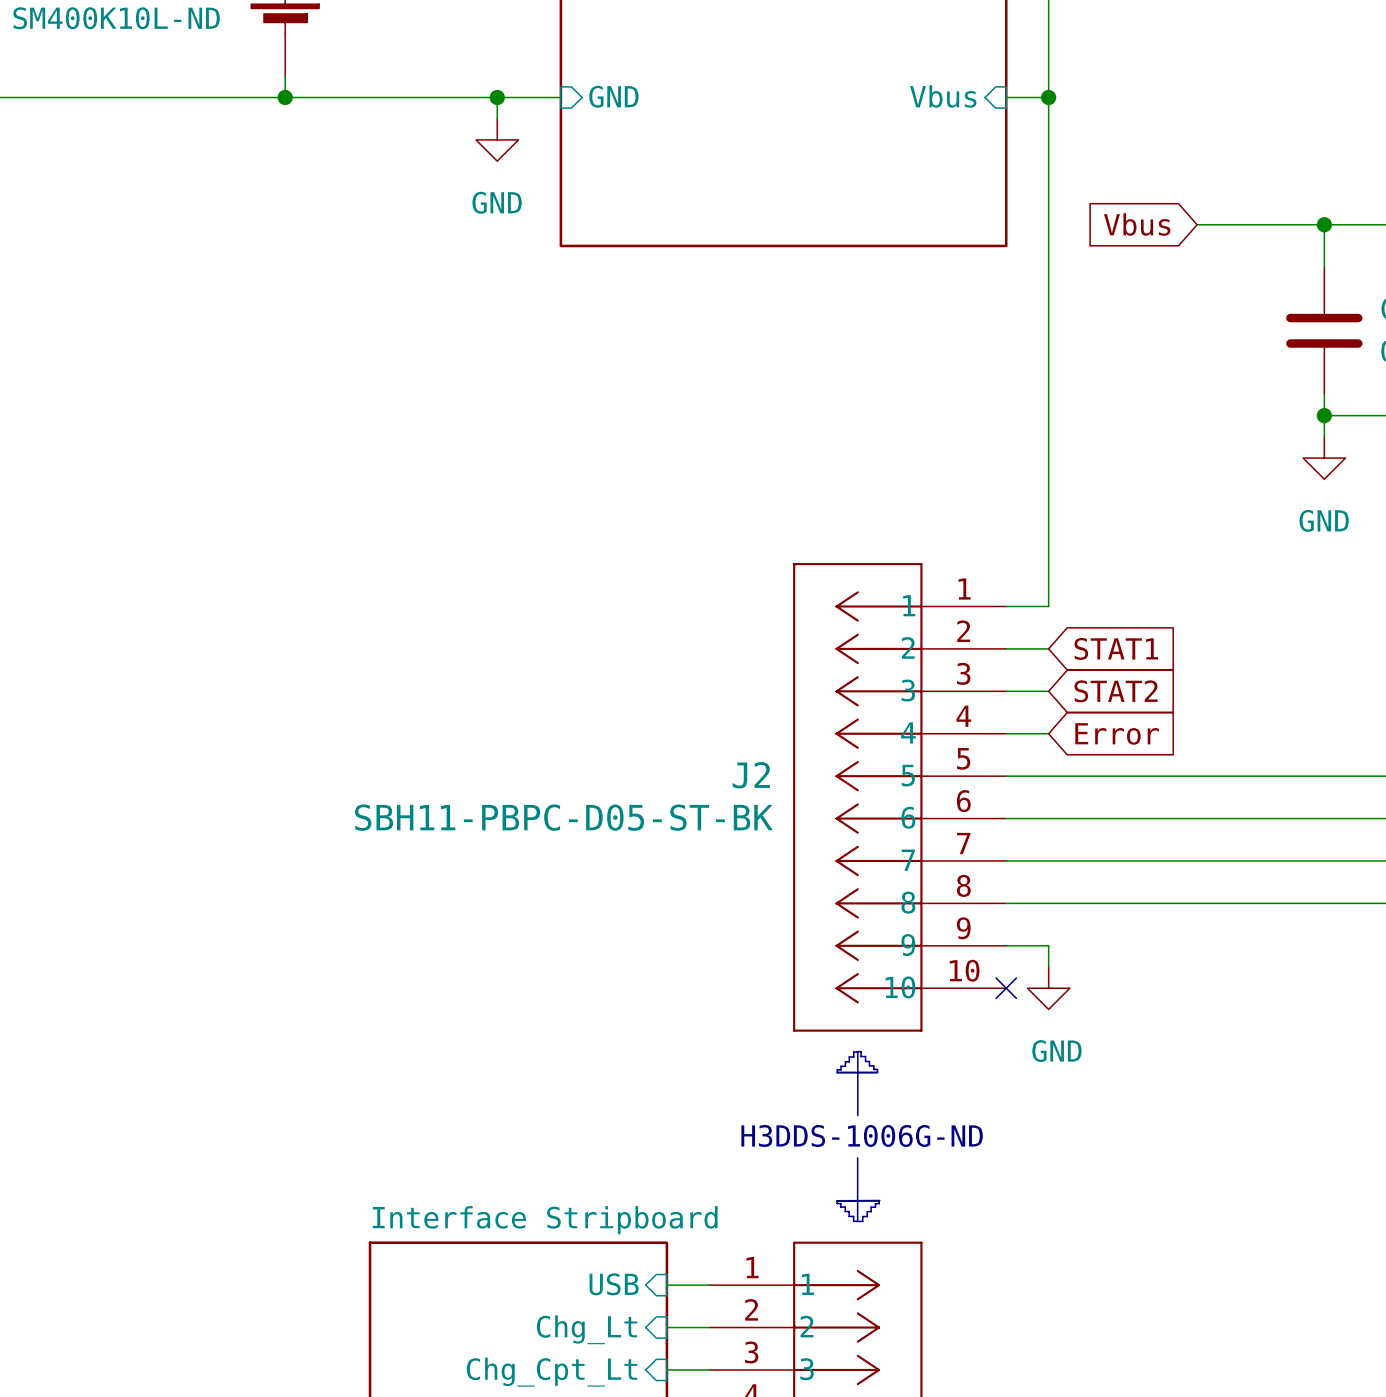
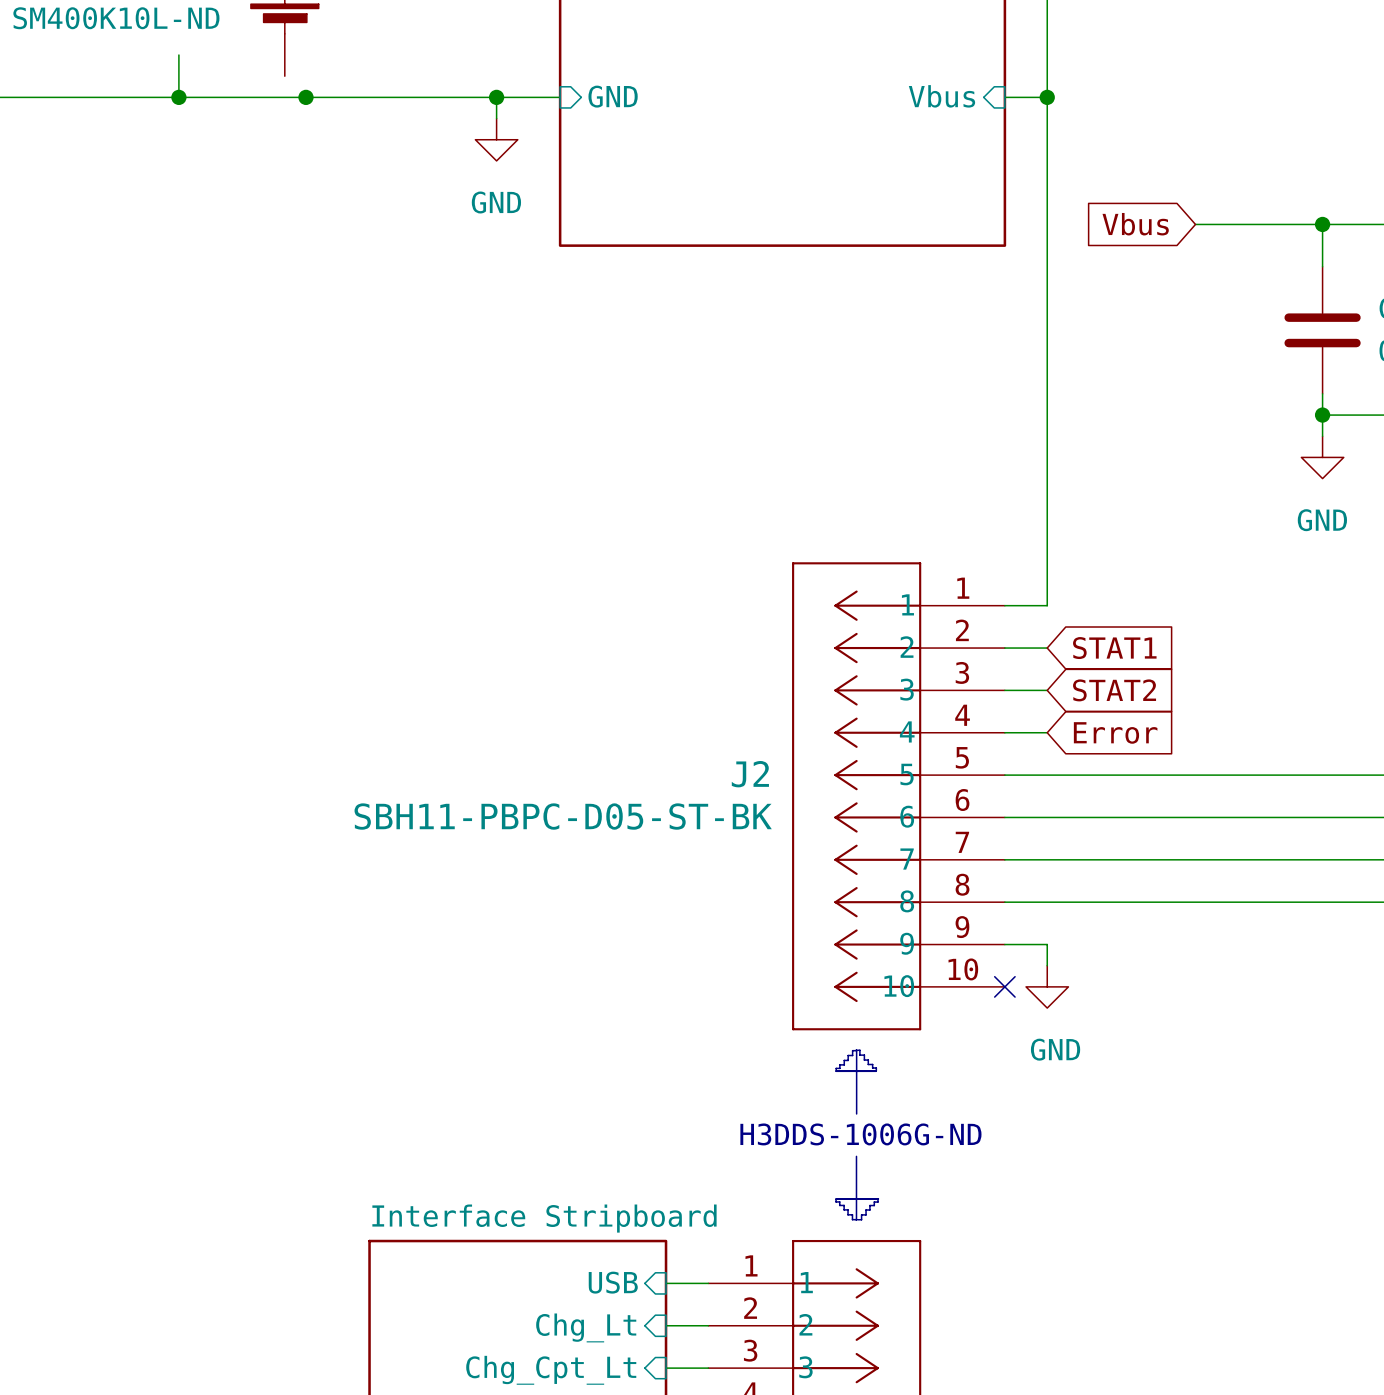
wire: none -> (178, 55) (178, 97)
wire: (285, 76) (285, 97) -> none
junction: none -> (178, 97)
junction position: (285, 97) -> (305, 97)

